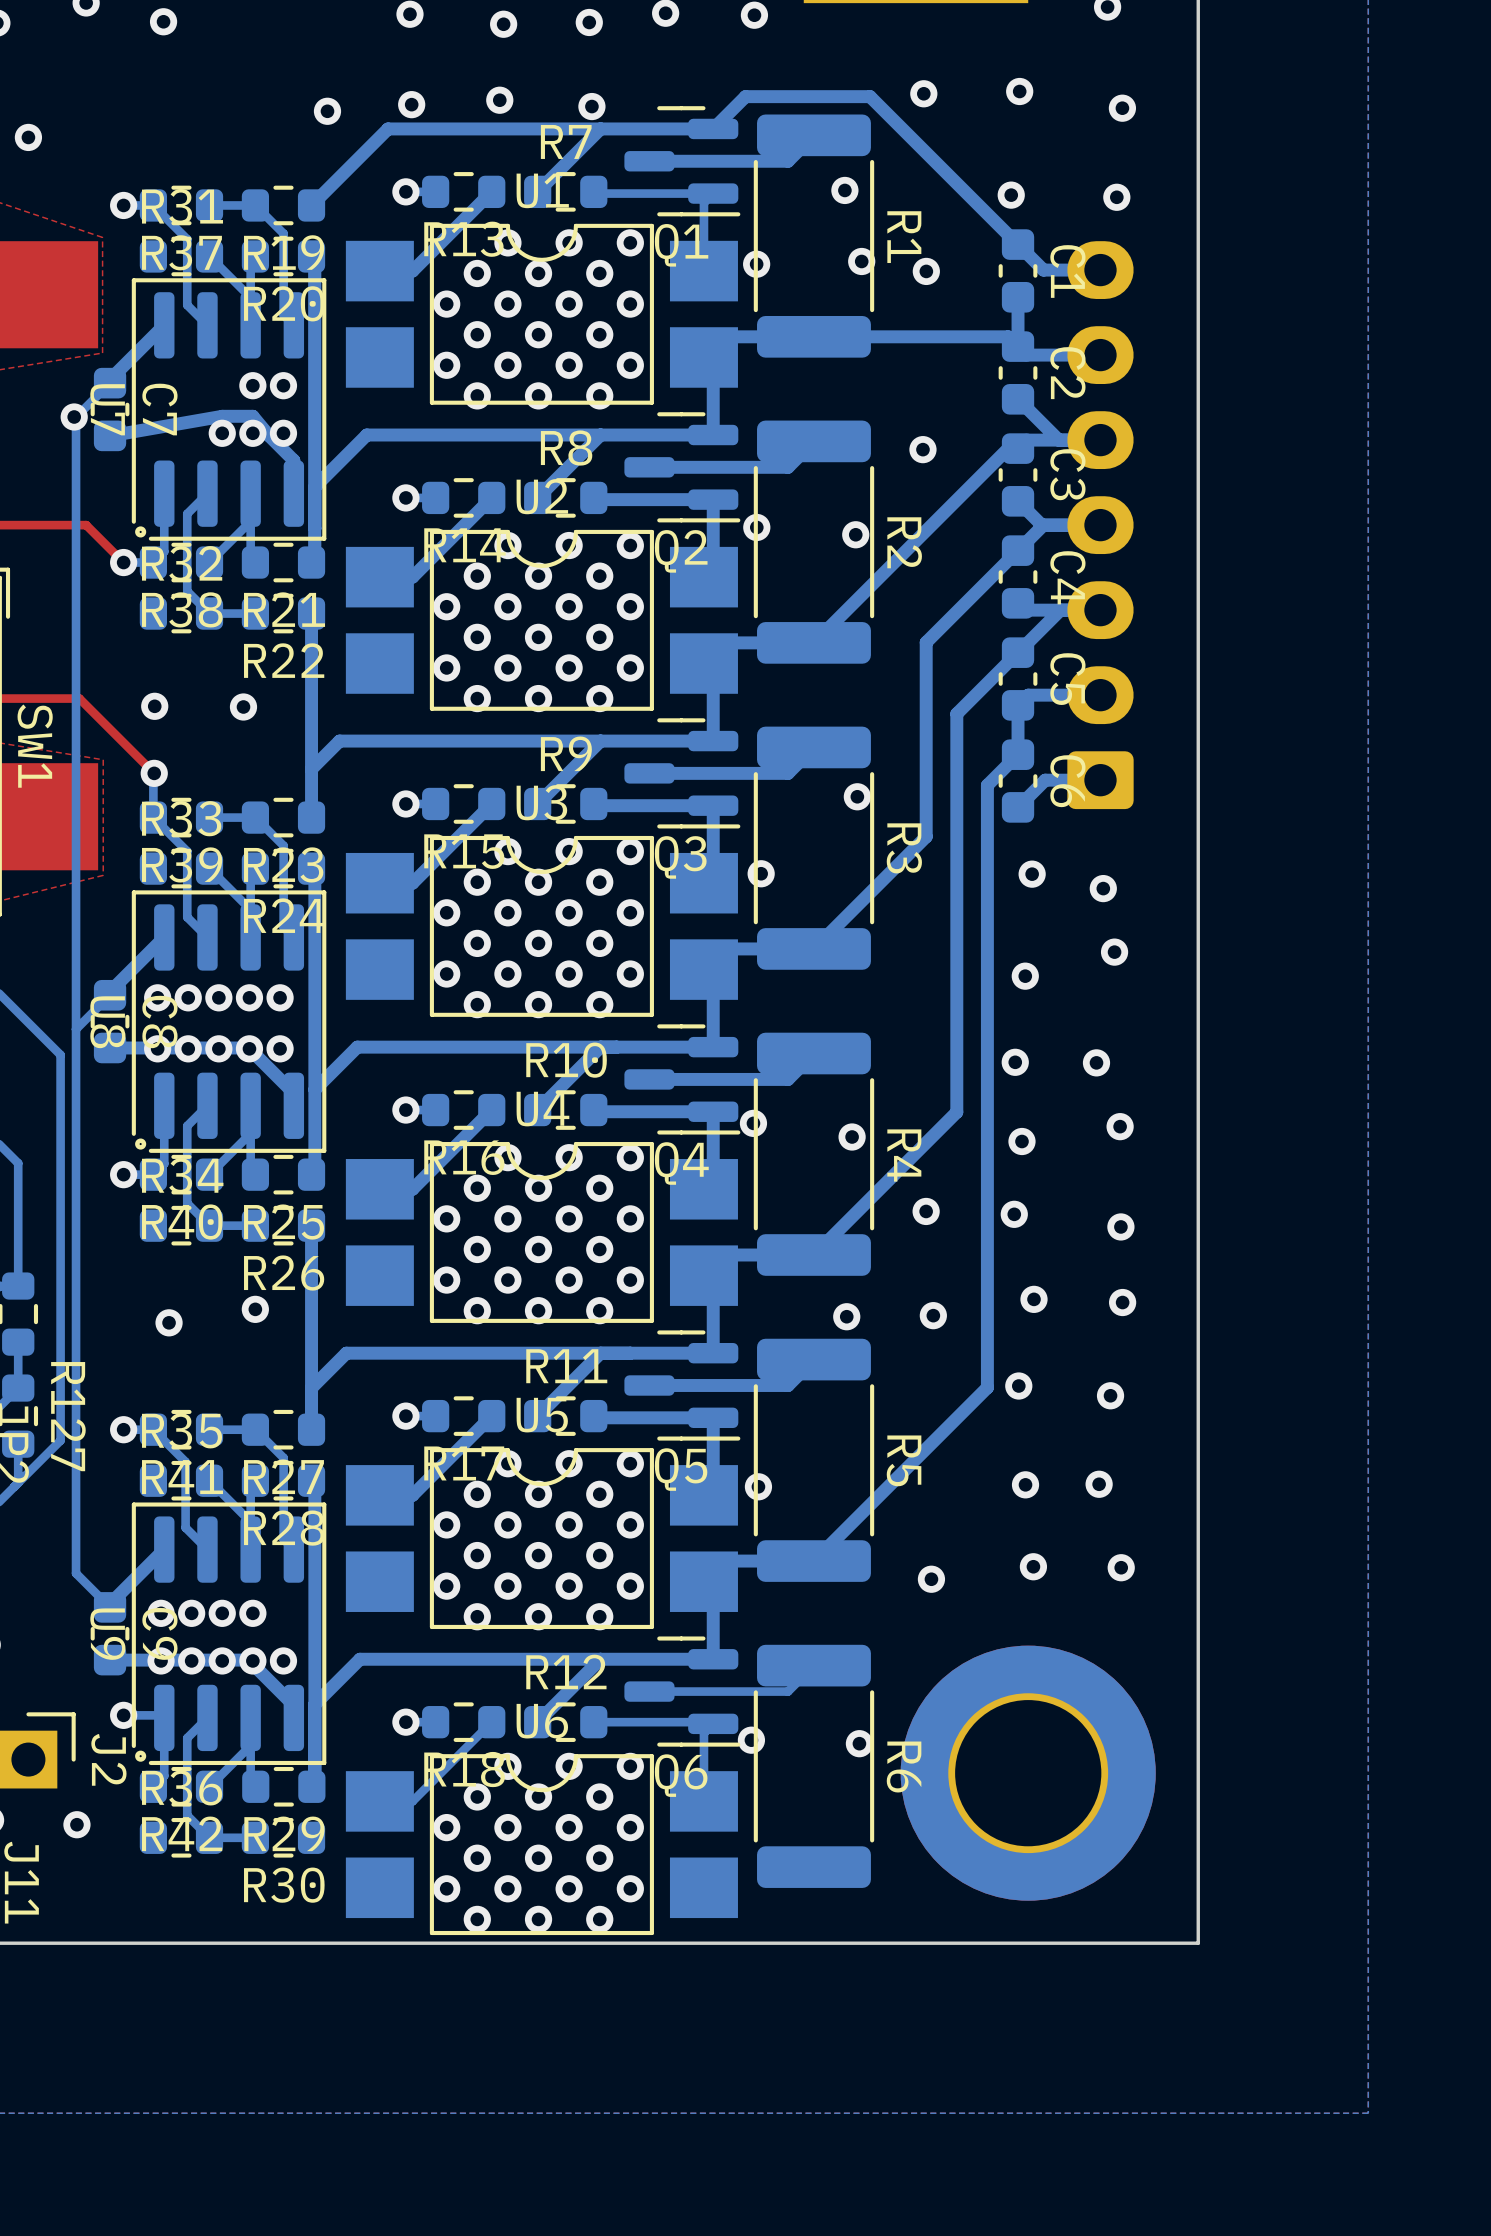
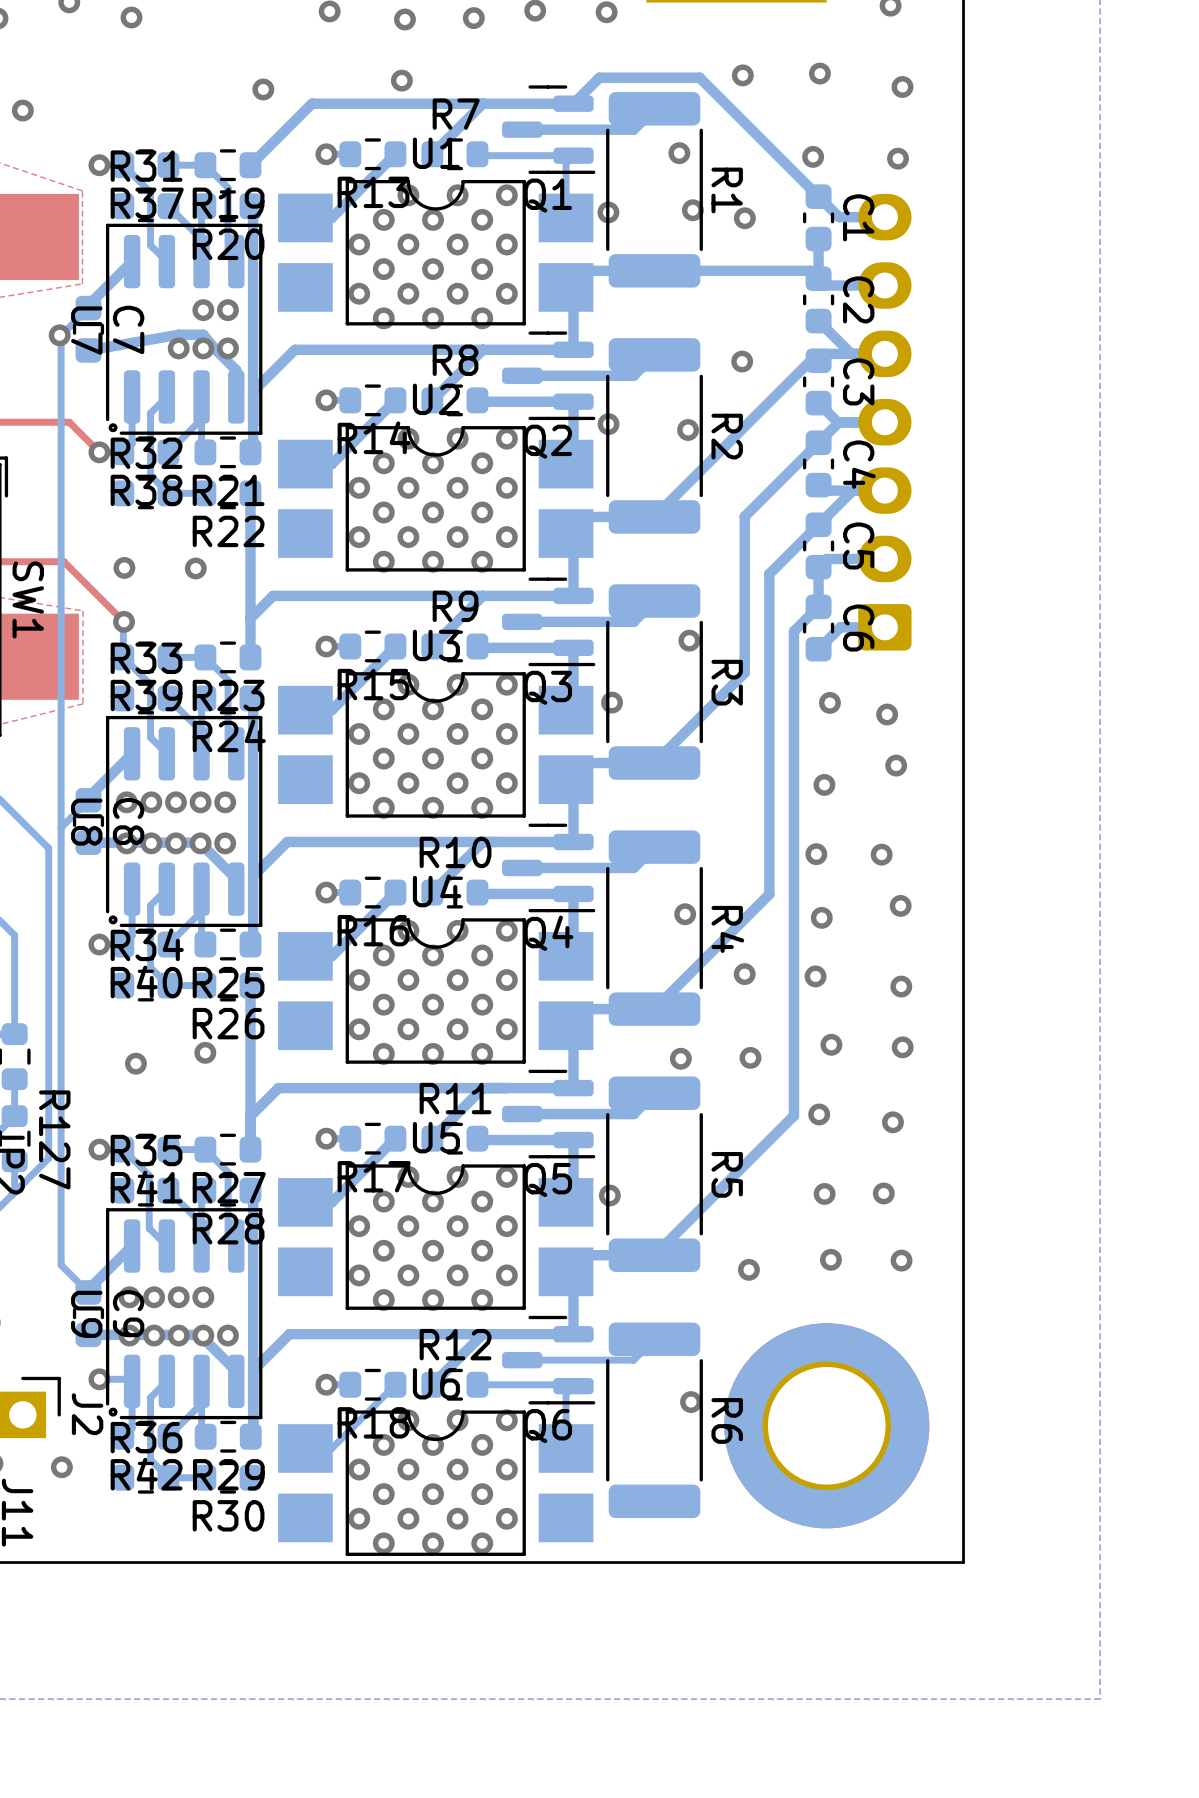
via: (411, 104) -> none
via: (591, 106) -> none
via: (753, 1123) -> none
via: (751, 1740) -> none

